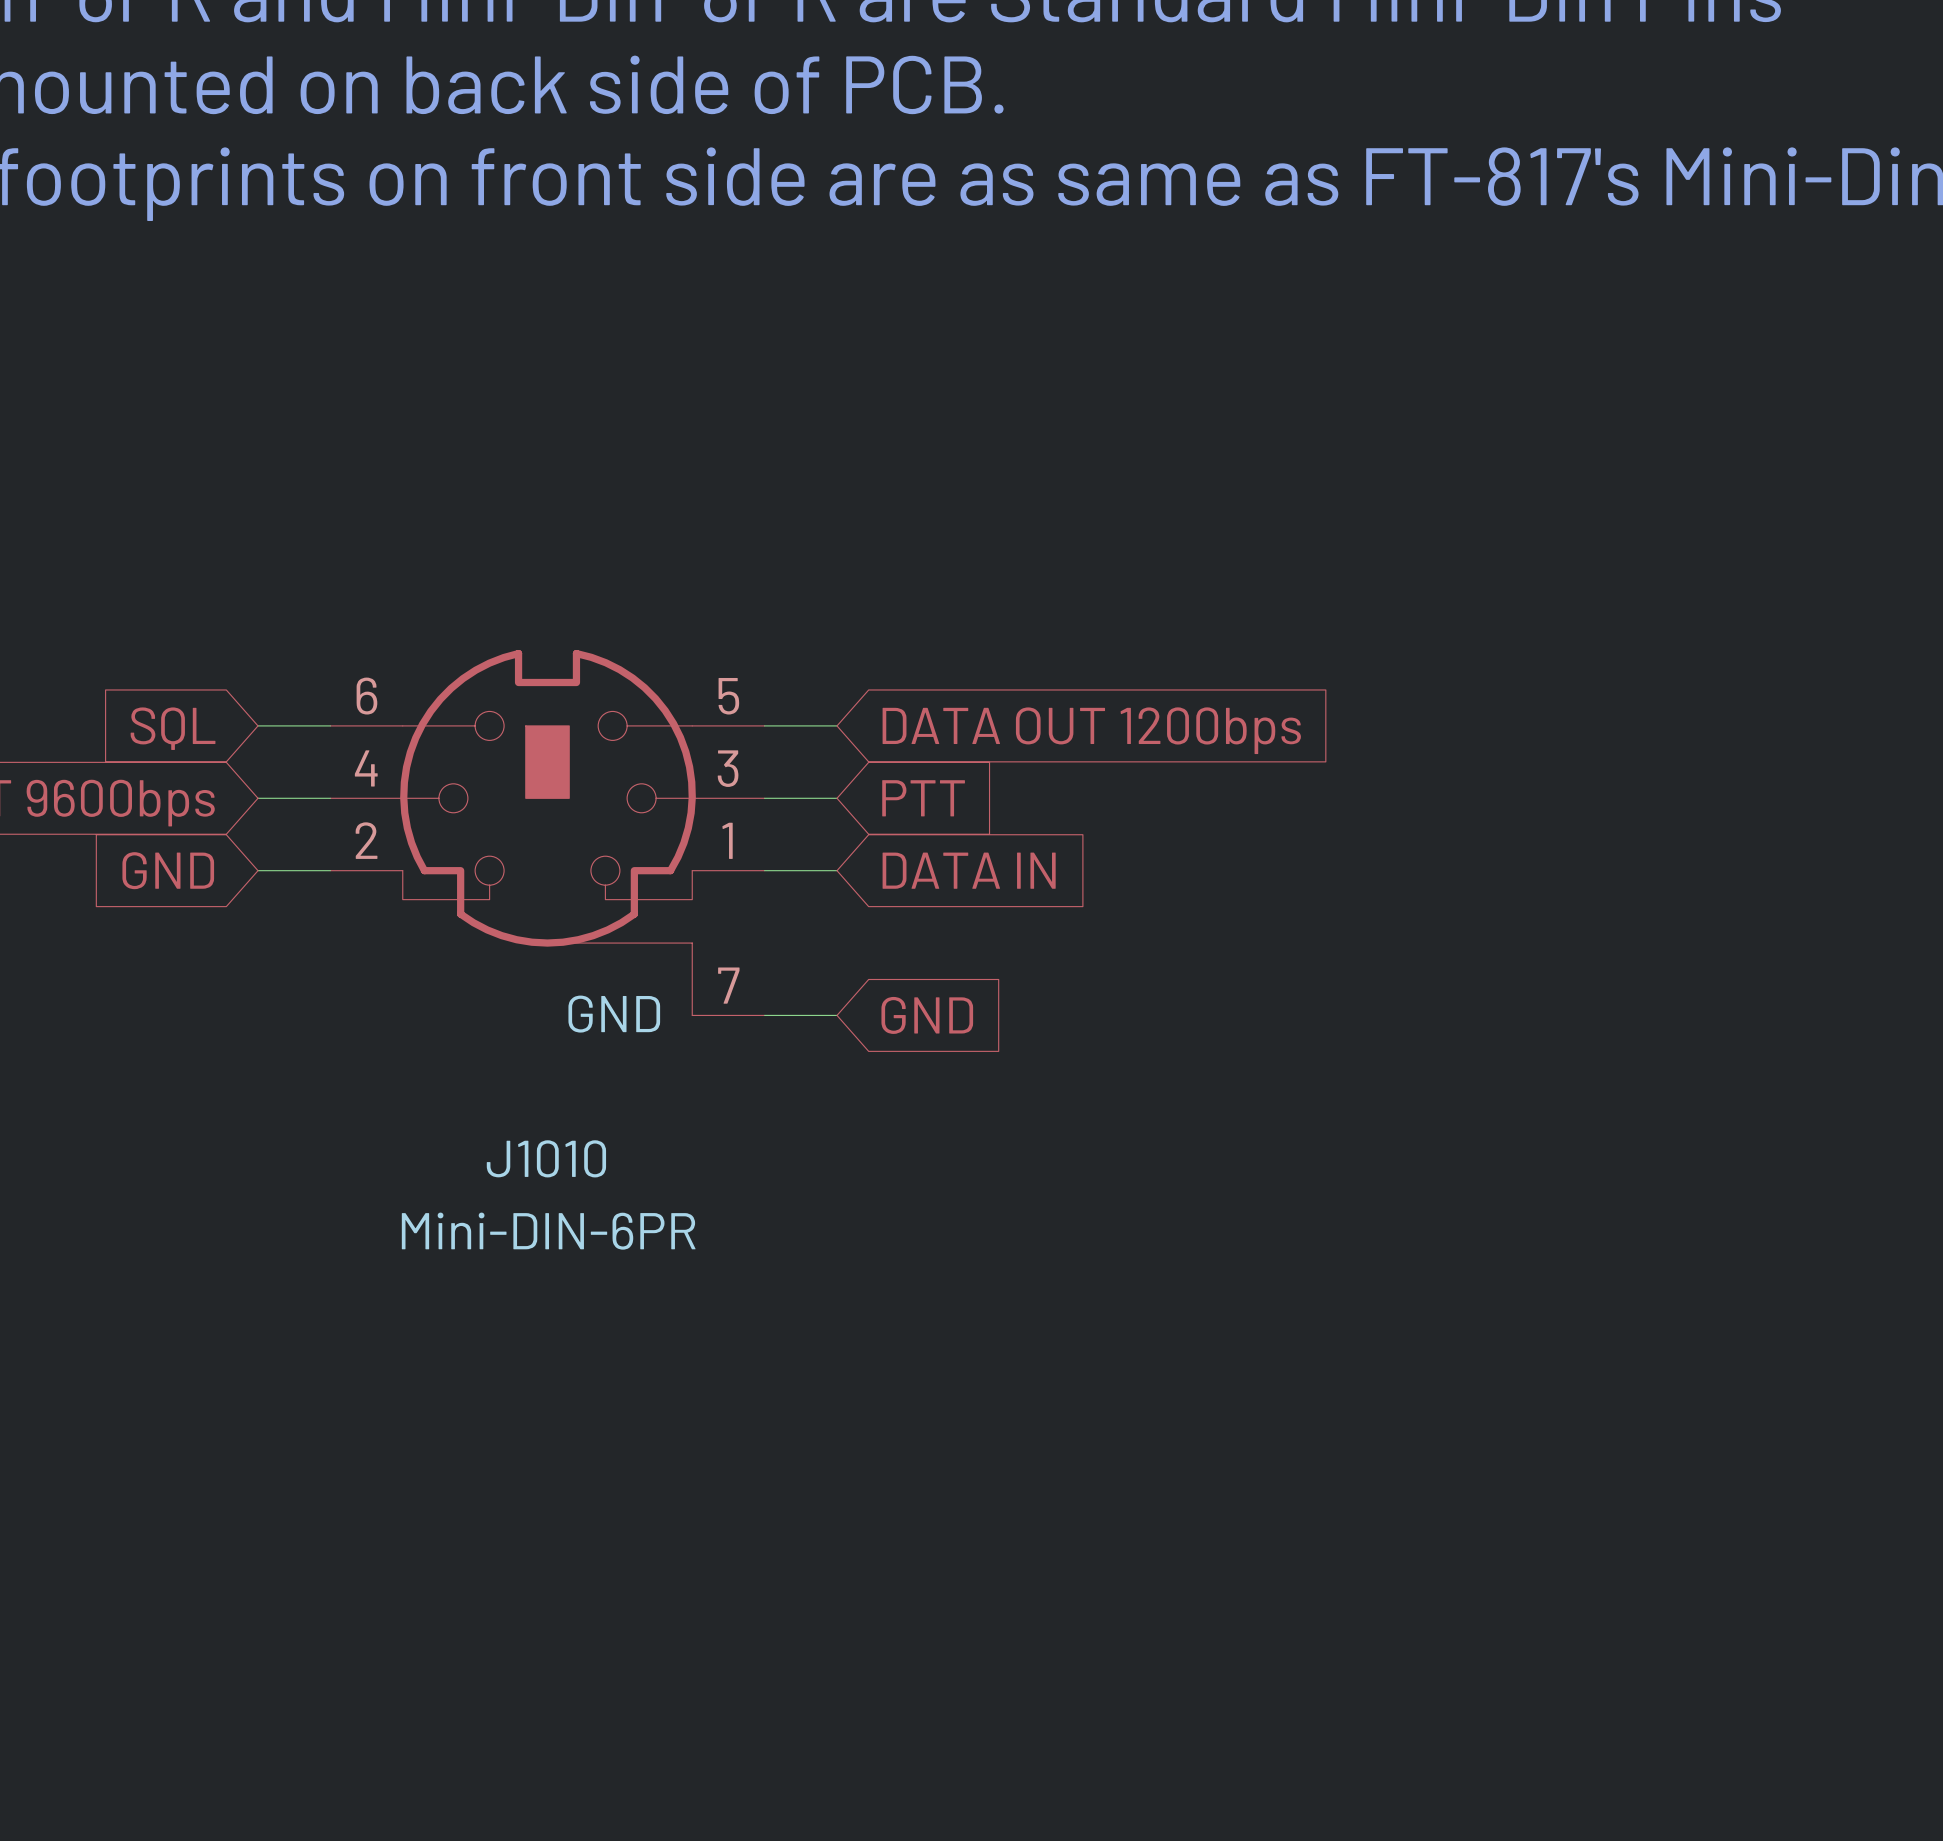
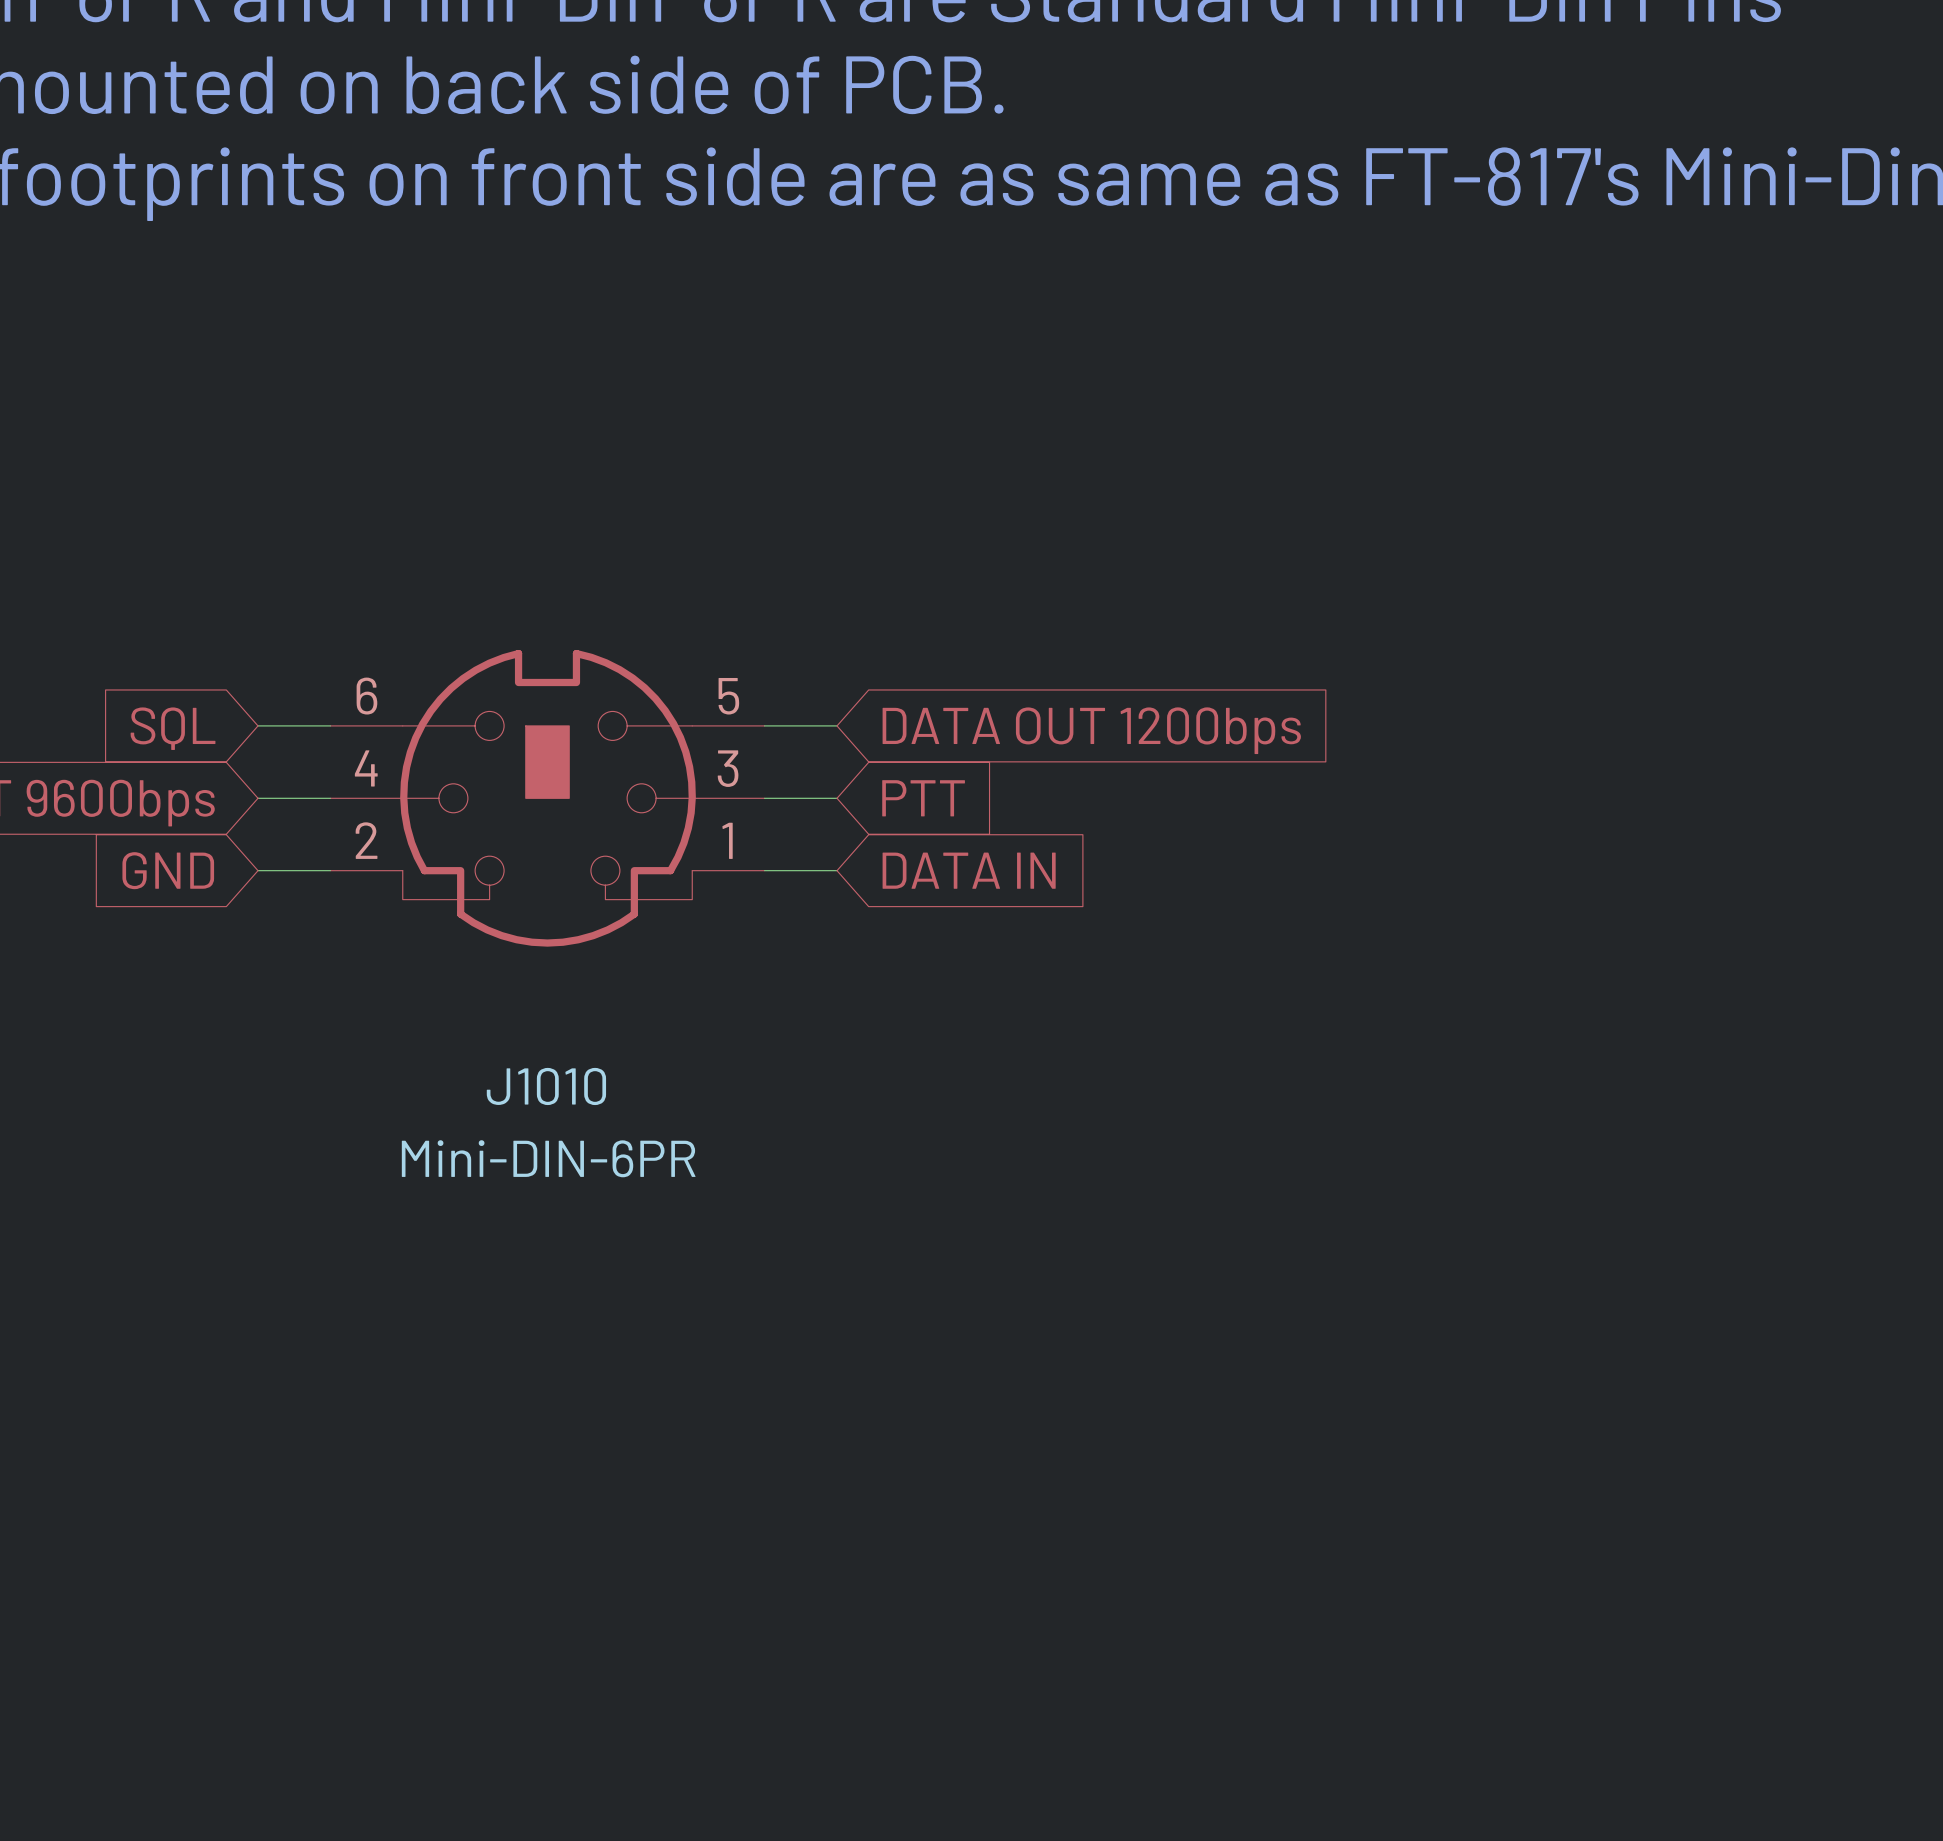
J1010 symbol: [330, 649, 765, 1016] -> [330, 649, 765, 947]
wire: (764, 1015) (837, 1015) -> none
global label: GND (927, 1015) -> none

